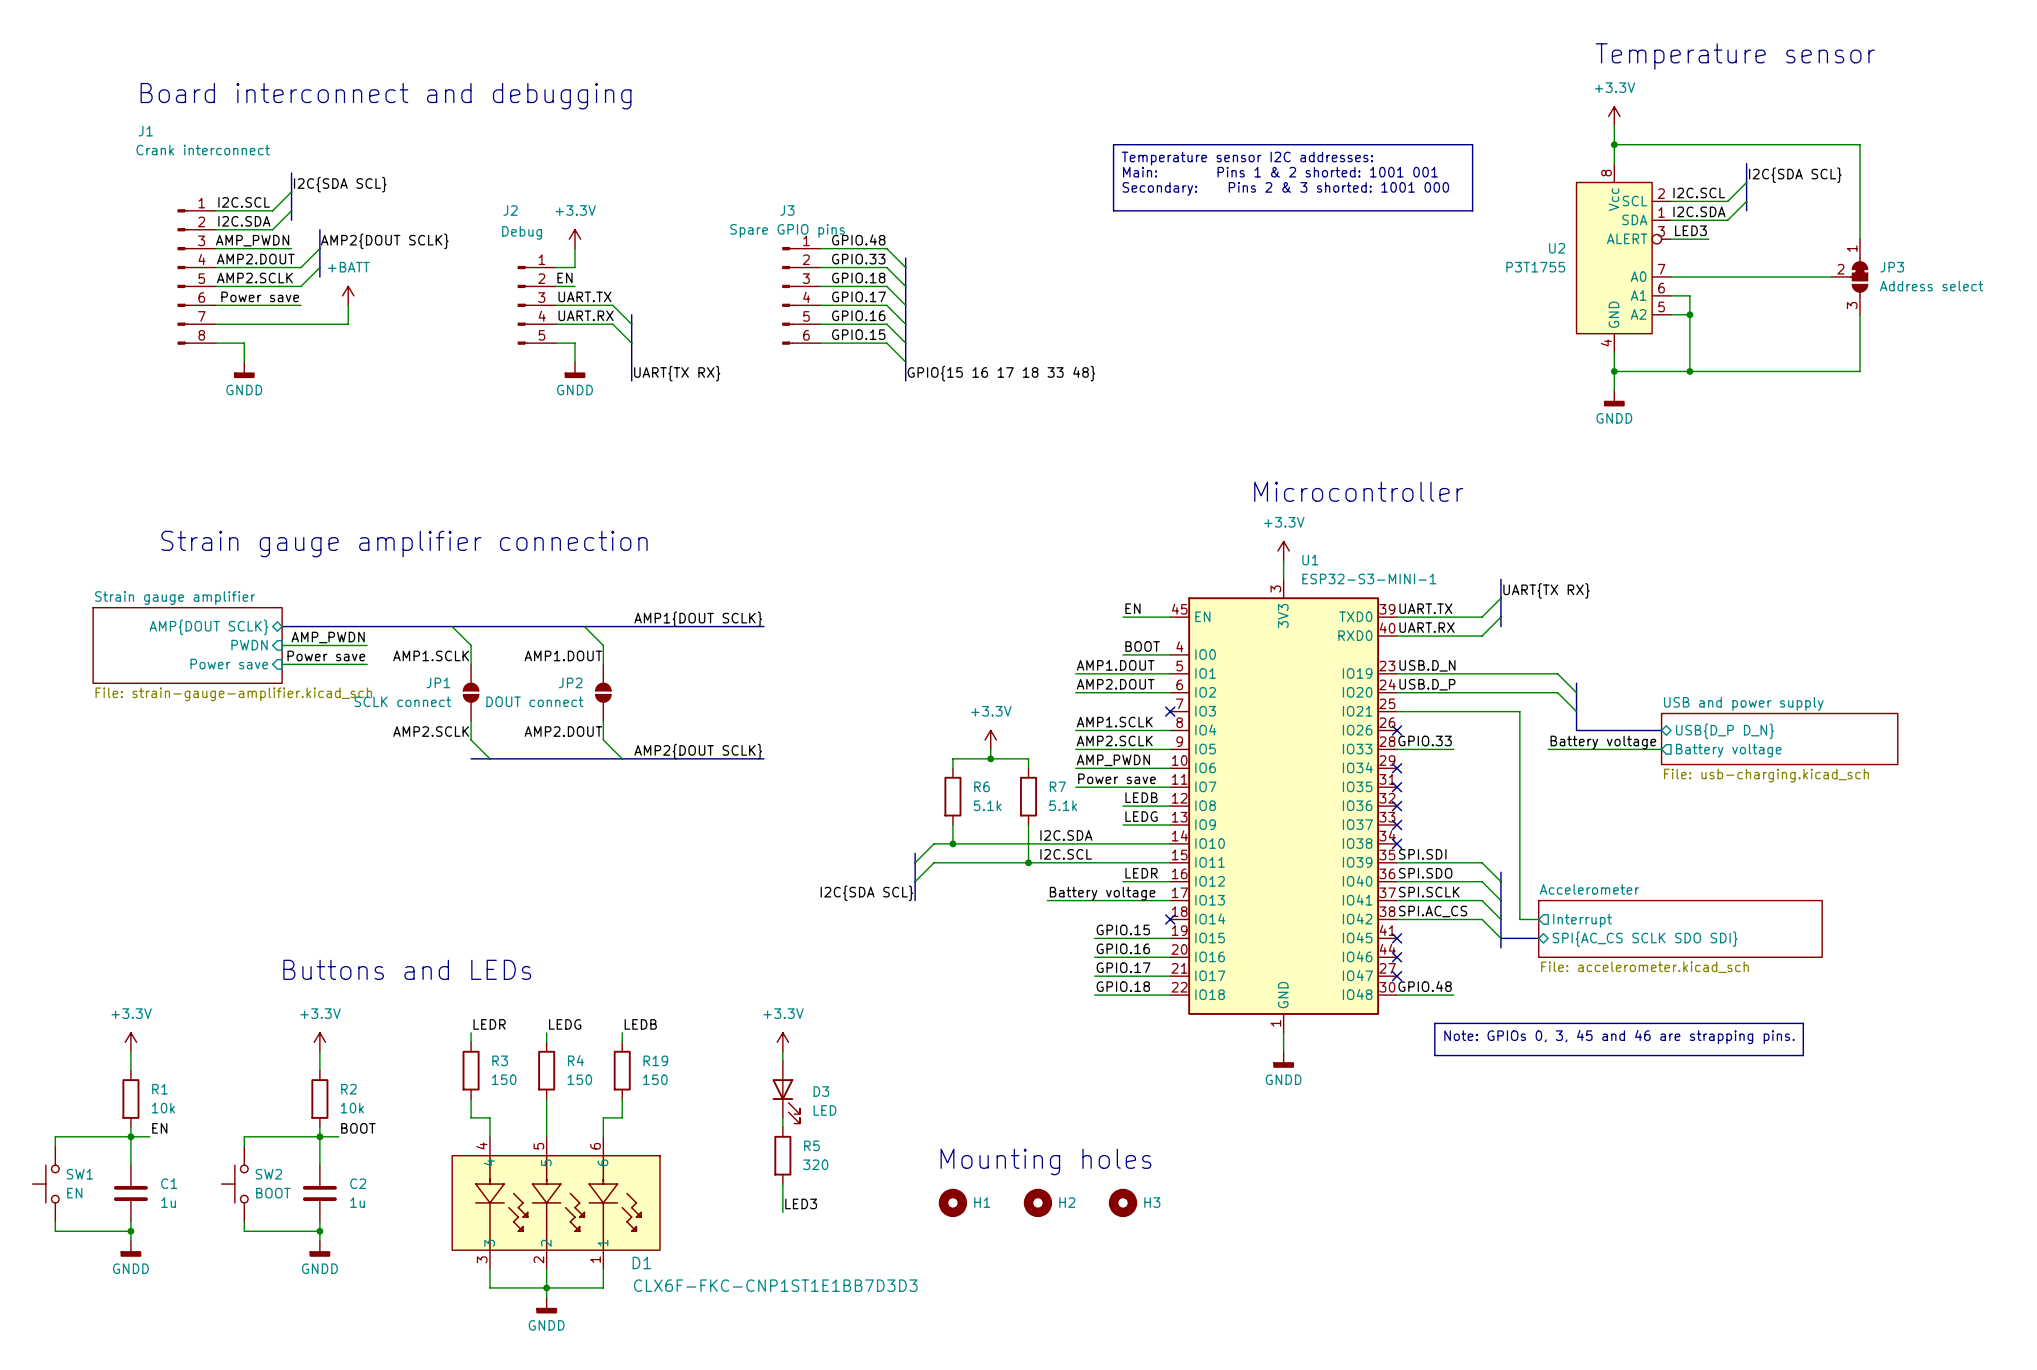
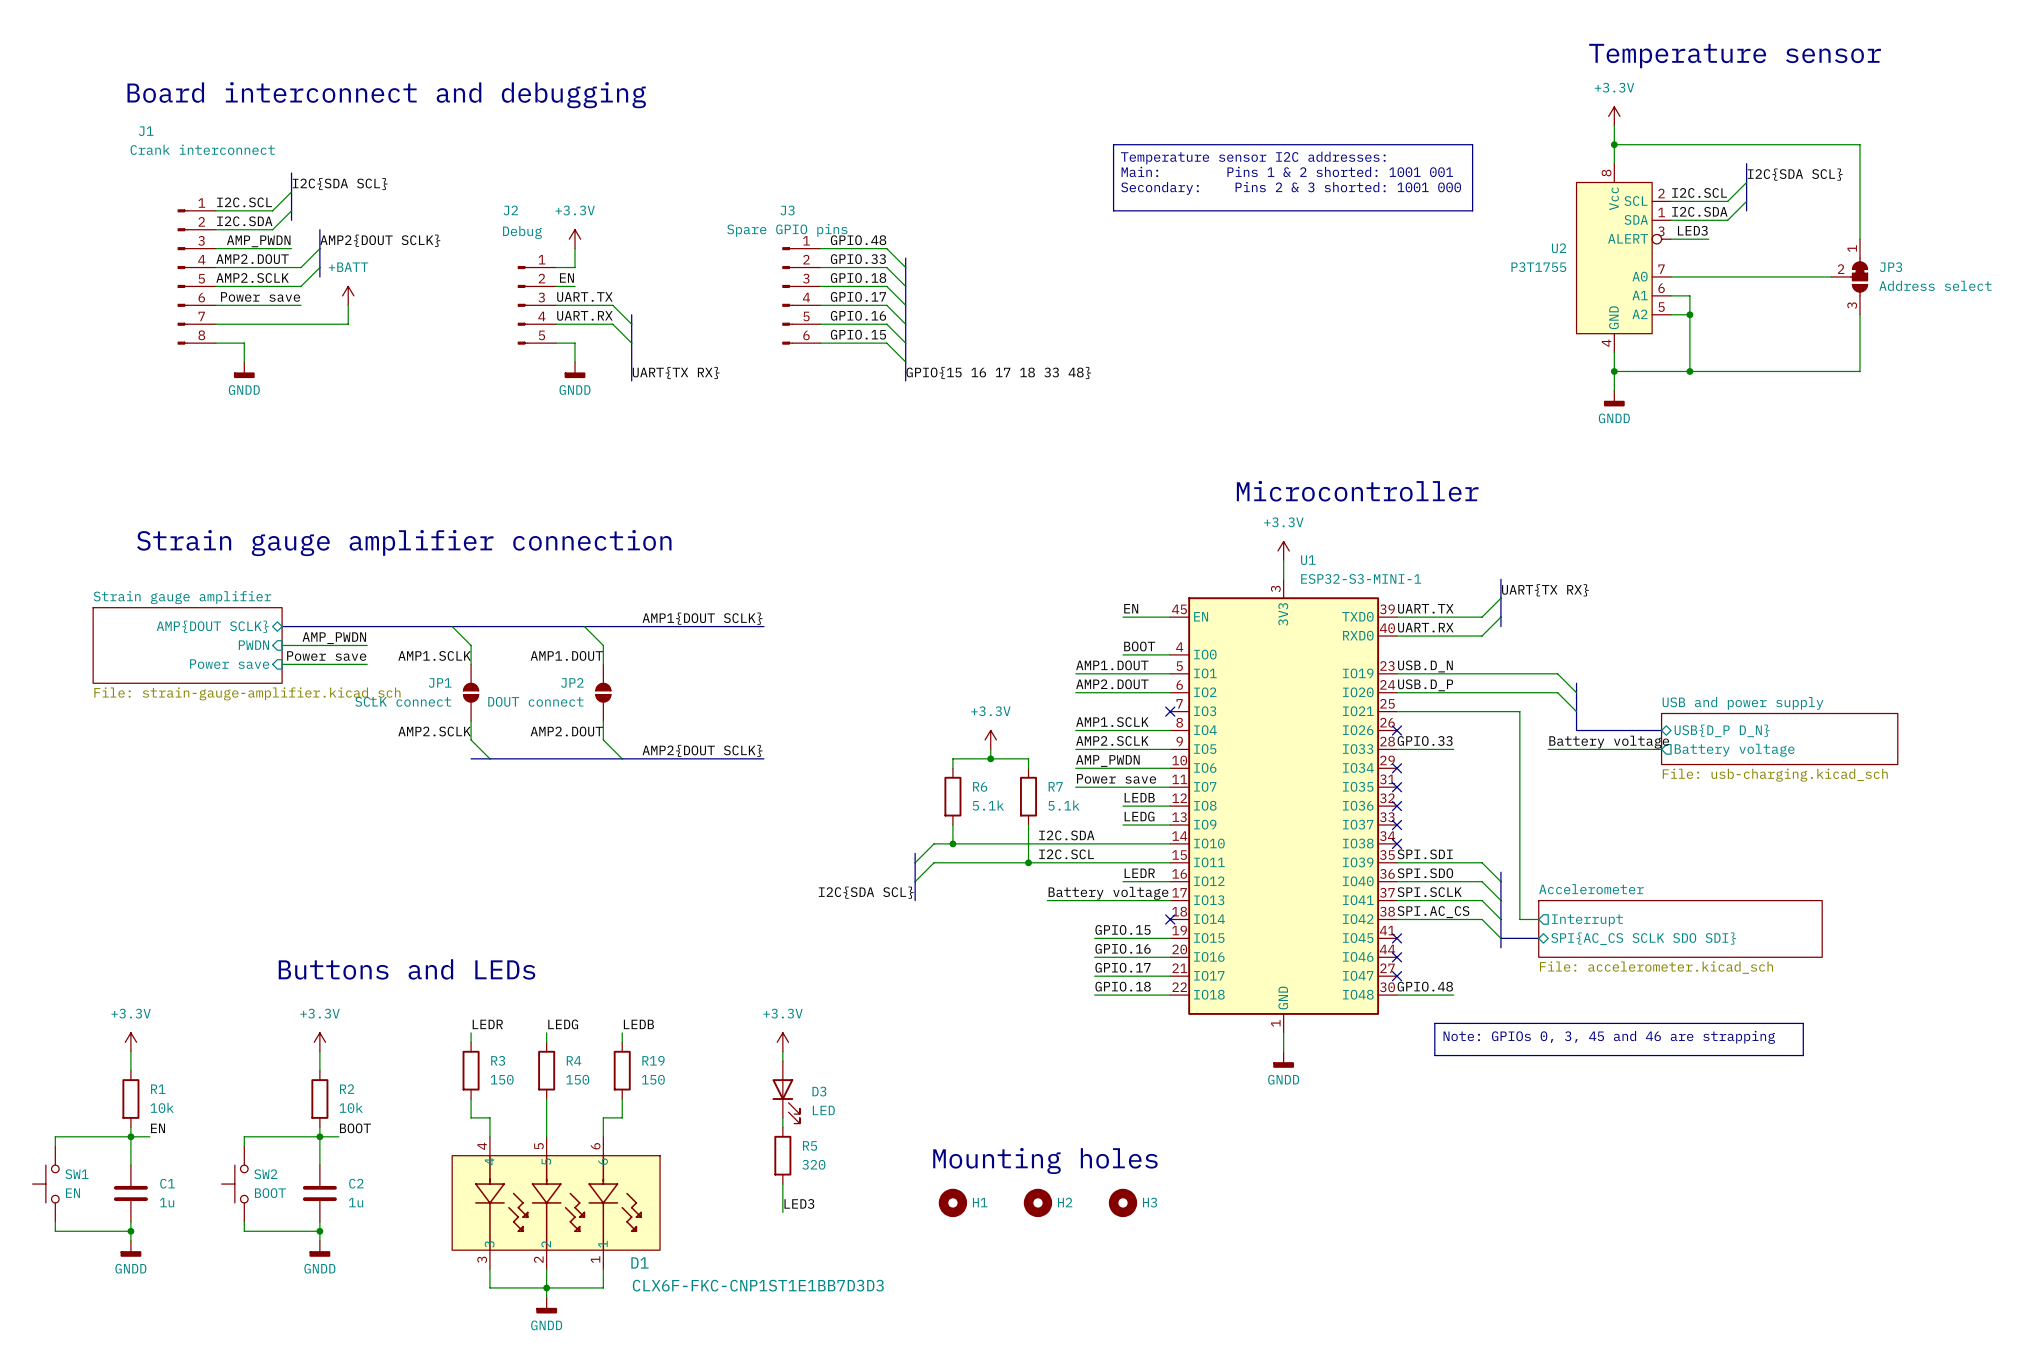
text: Note: GPIOs 0, 3, 45 and 46 are strapping pins. (1619, 1037) -> Note: GPIOs 0, 3, 45 and 46 are strapping (1609, 1037)

